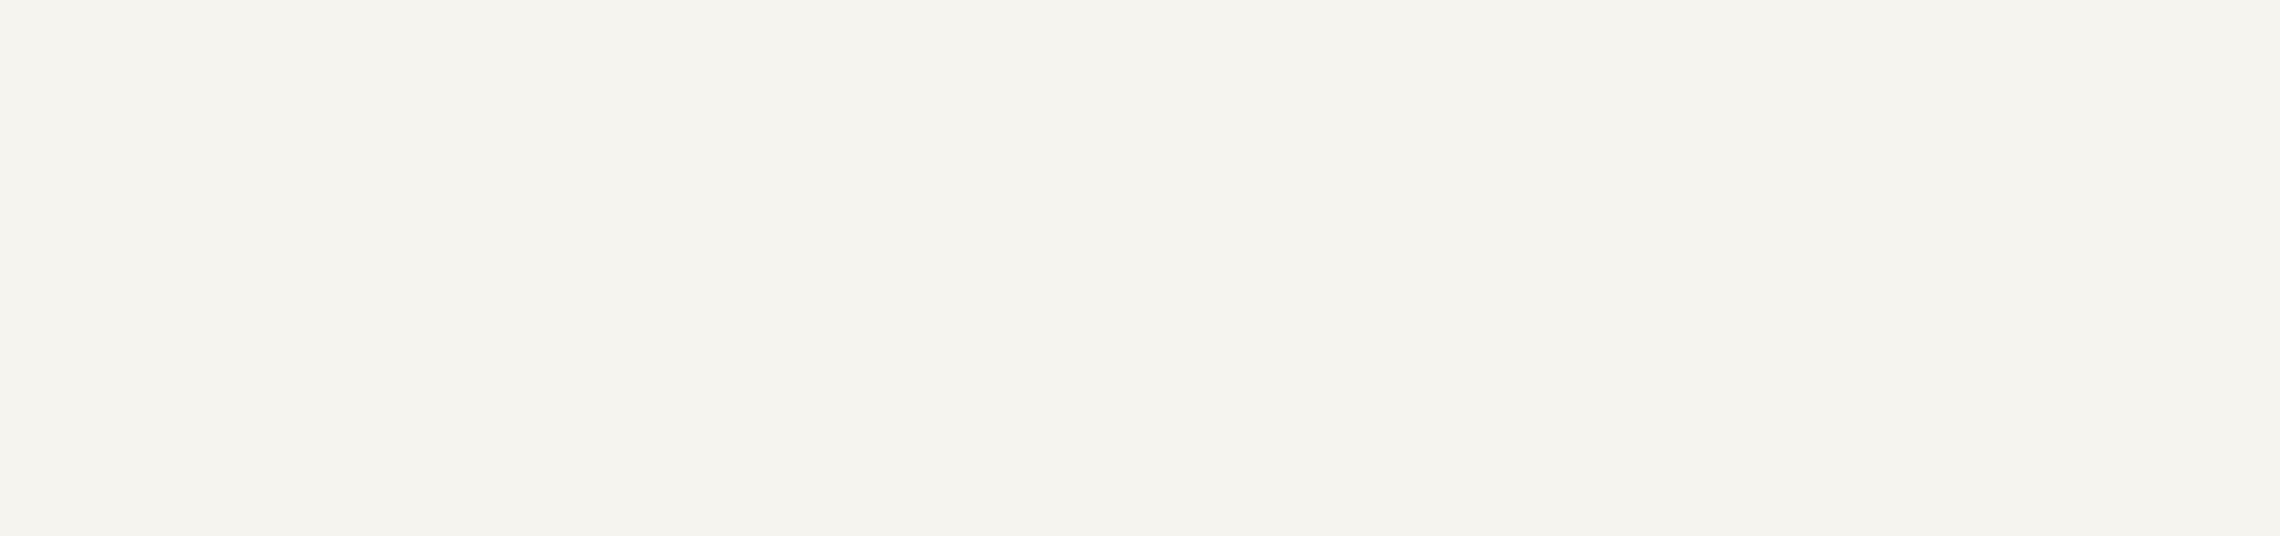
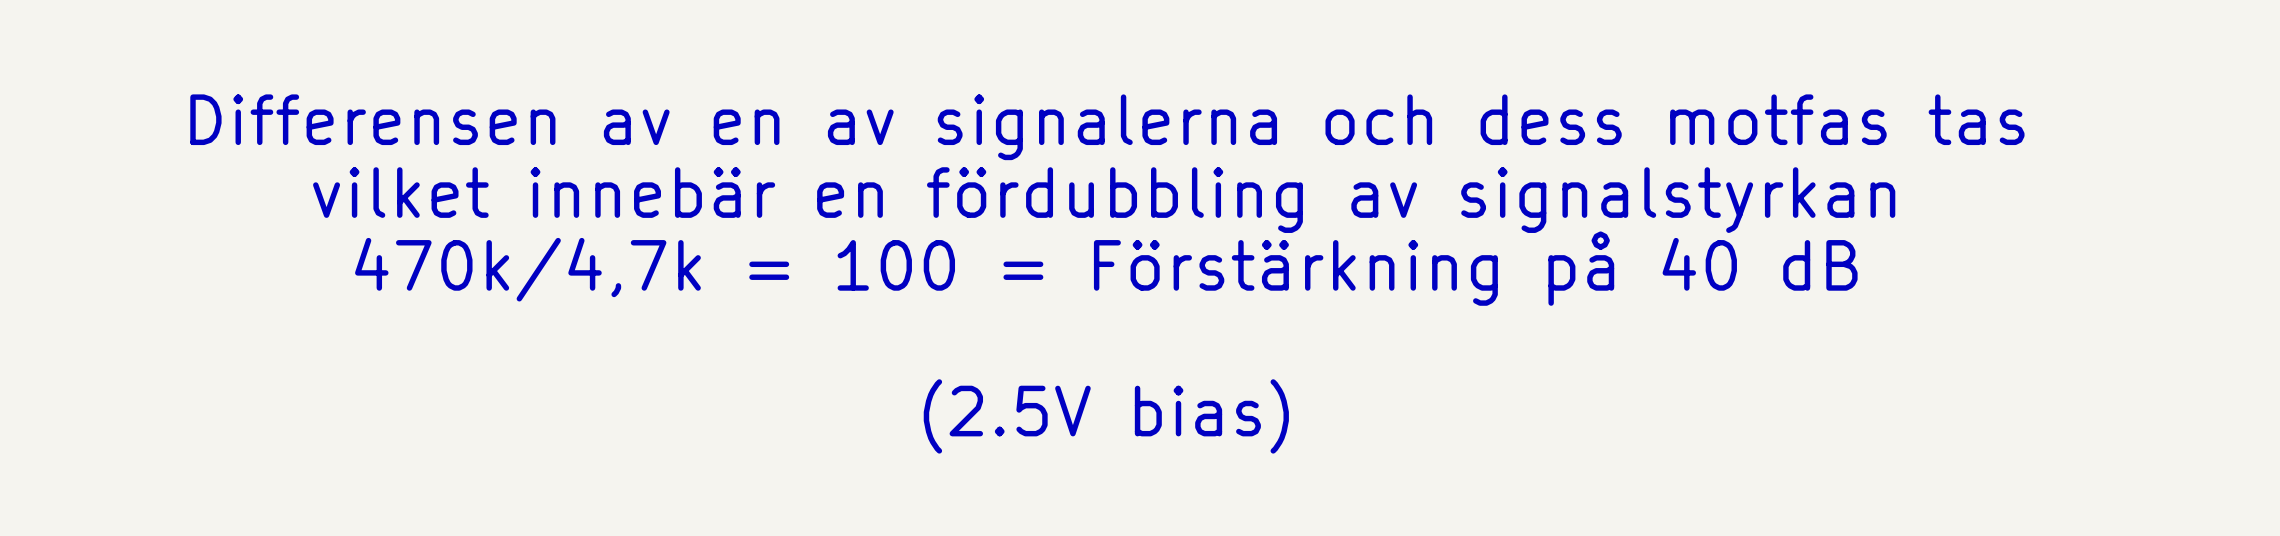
text: none -> Differensen av en av signalerna och dess motfas tas (1107, 127)
text: none -> vilket innebär en fördubbling av signalstyrkan (1104, 200)
text: none -> 470k/4,7k = 100 = Förstärkning på 40 dB (1106, 268)
text: none -> (2.5V bias) (1106, 416)

